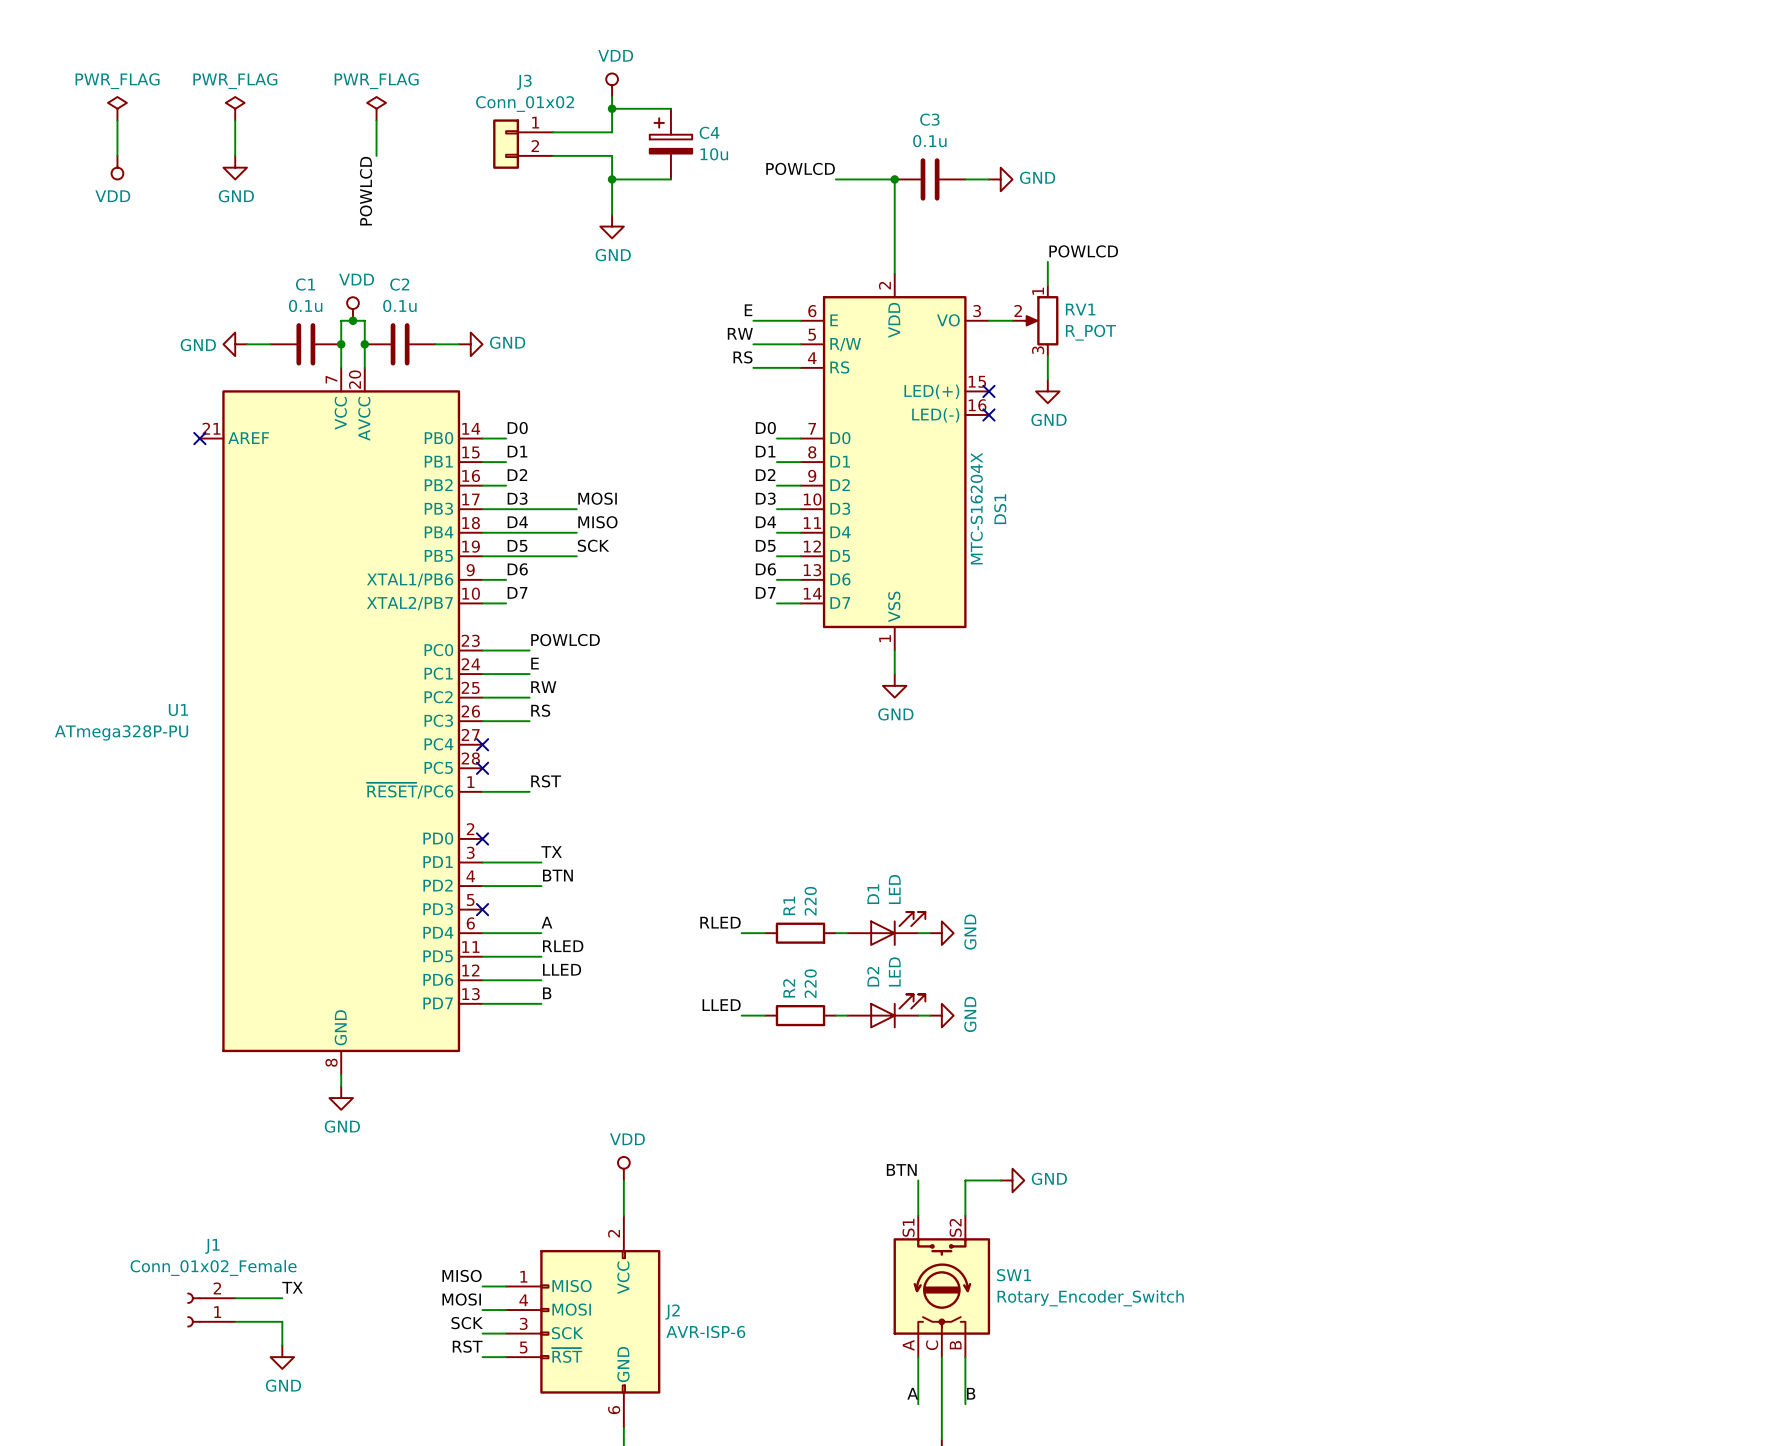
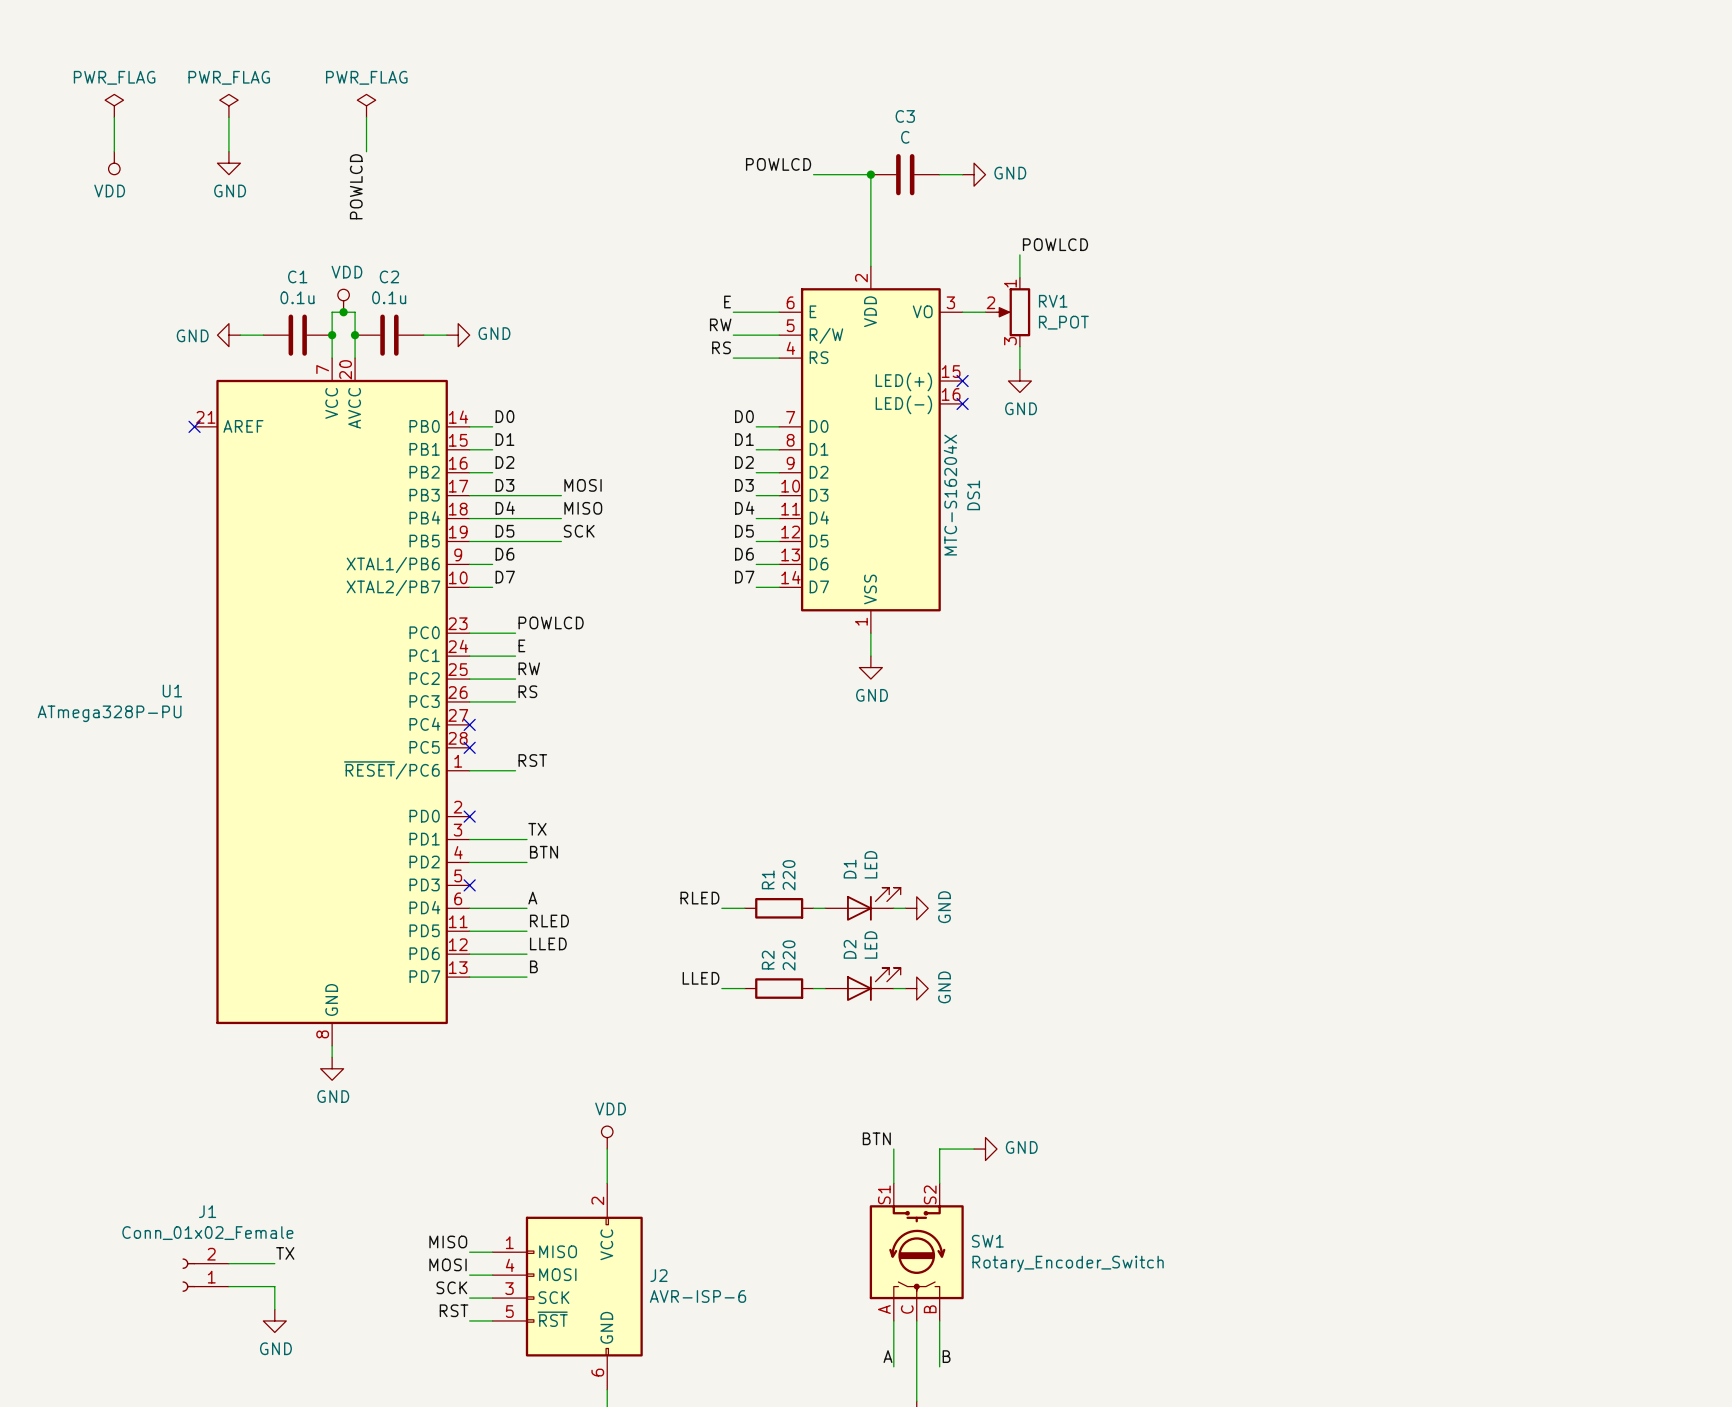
power symbol: VDD (612, 85) -> none
wire: (612, 97) (612, 132) (553, 132) -> none
wire: (612, 108) (670, 108) -> none
junction: (612, 108) -> none
C3 value: 0.1u (929, 141) -> C (905, 137)
J3: Conn_01x02 (523, 144) -> none
C4: 10u (670, 144) -> none
wire: (553, 155) (612, 155) (612, 214) -> none
wire: (612, 179) (670, 179) -> none
junction: (612, 179) -> none
power symbol: GND (612, 226) -> none

